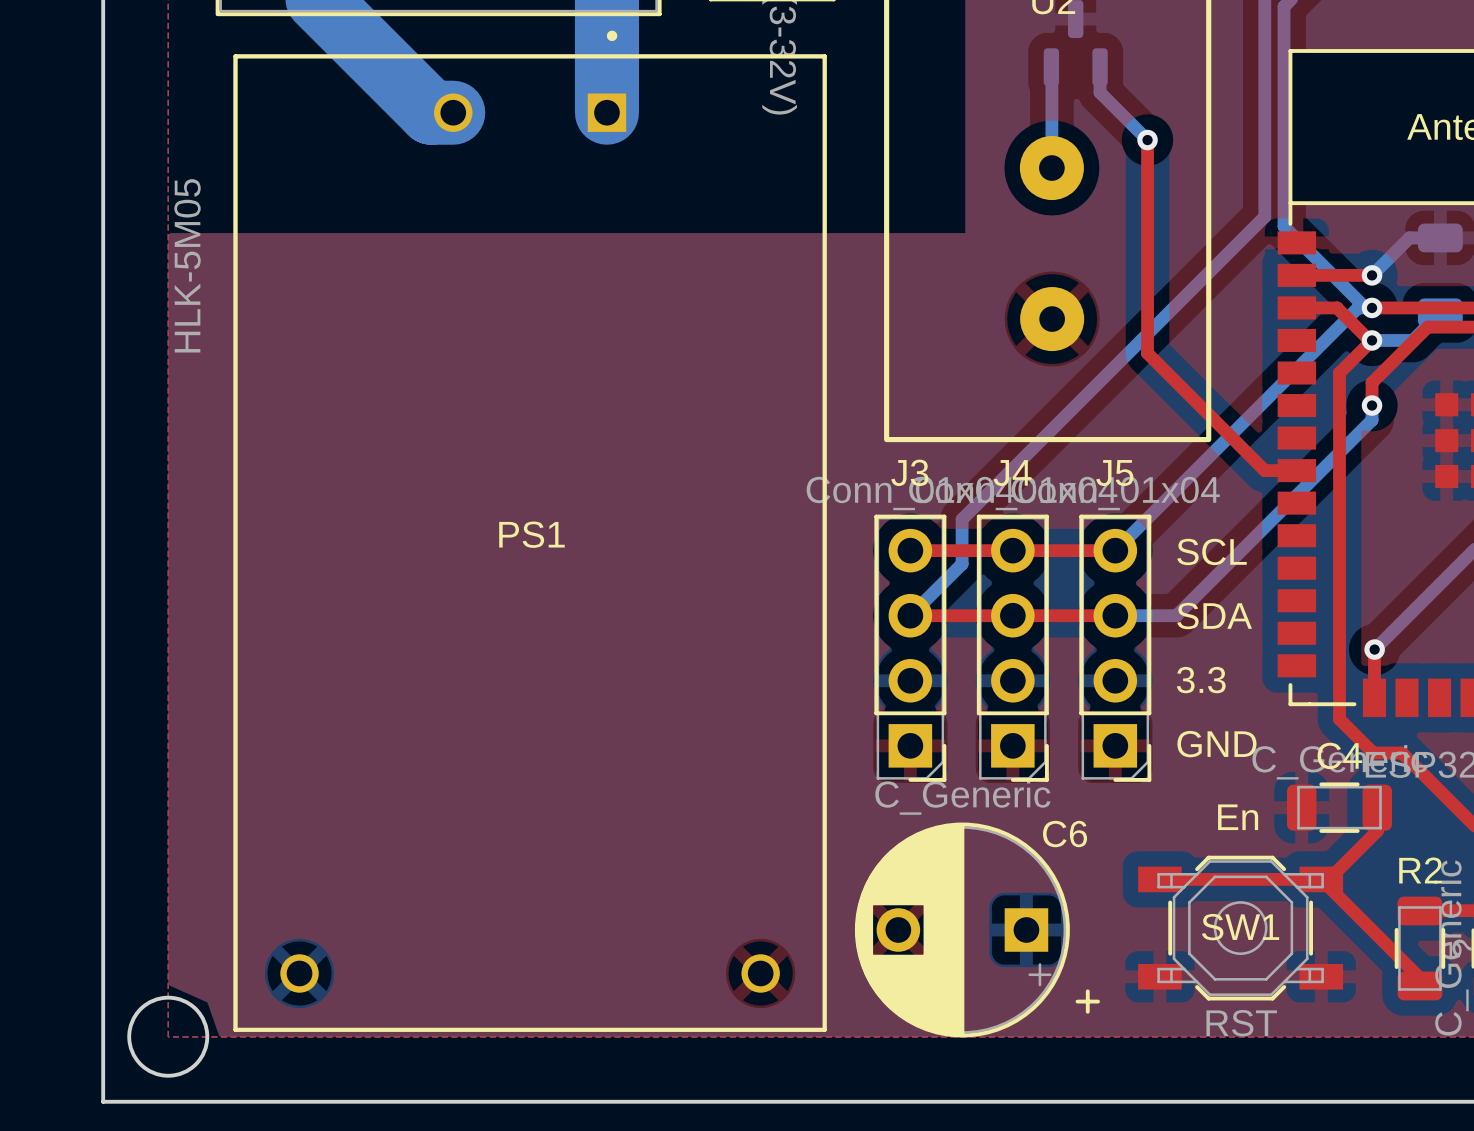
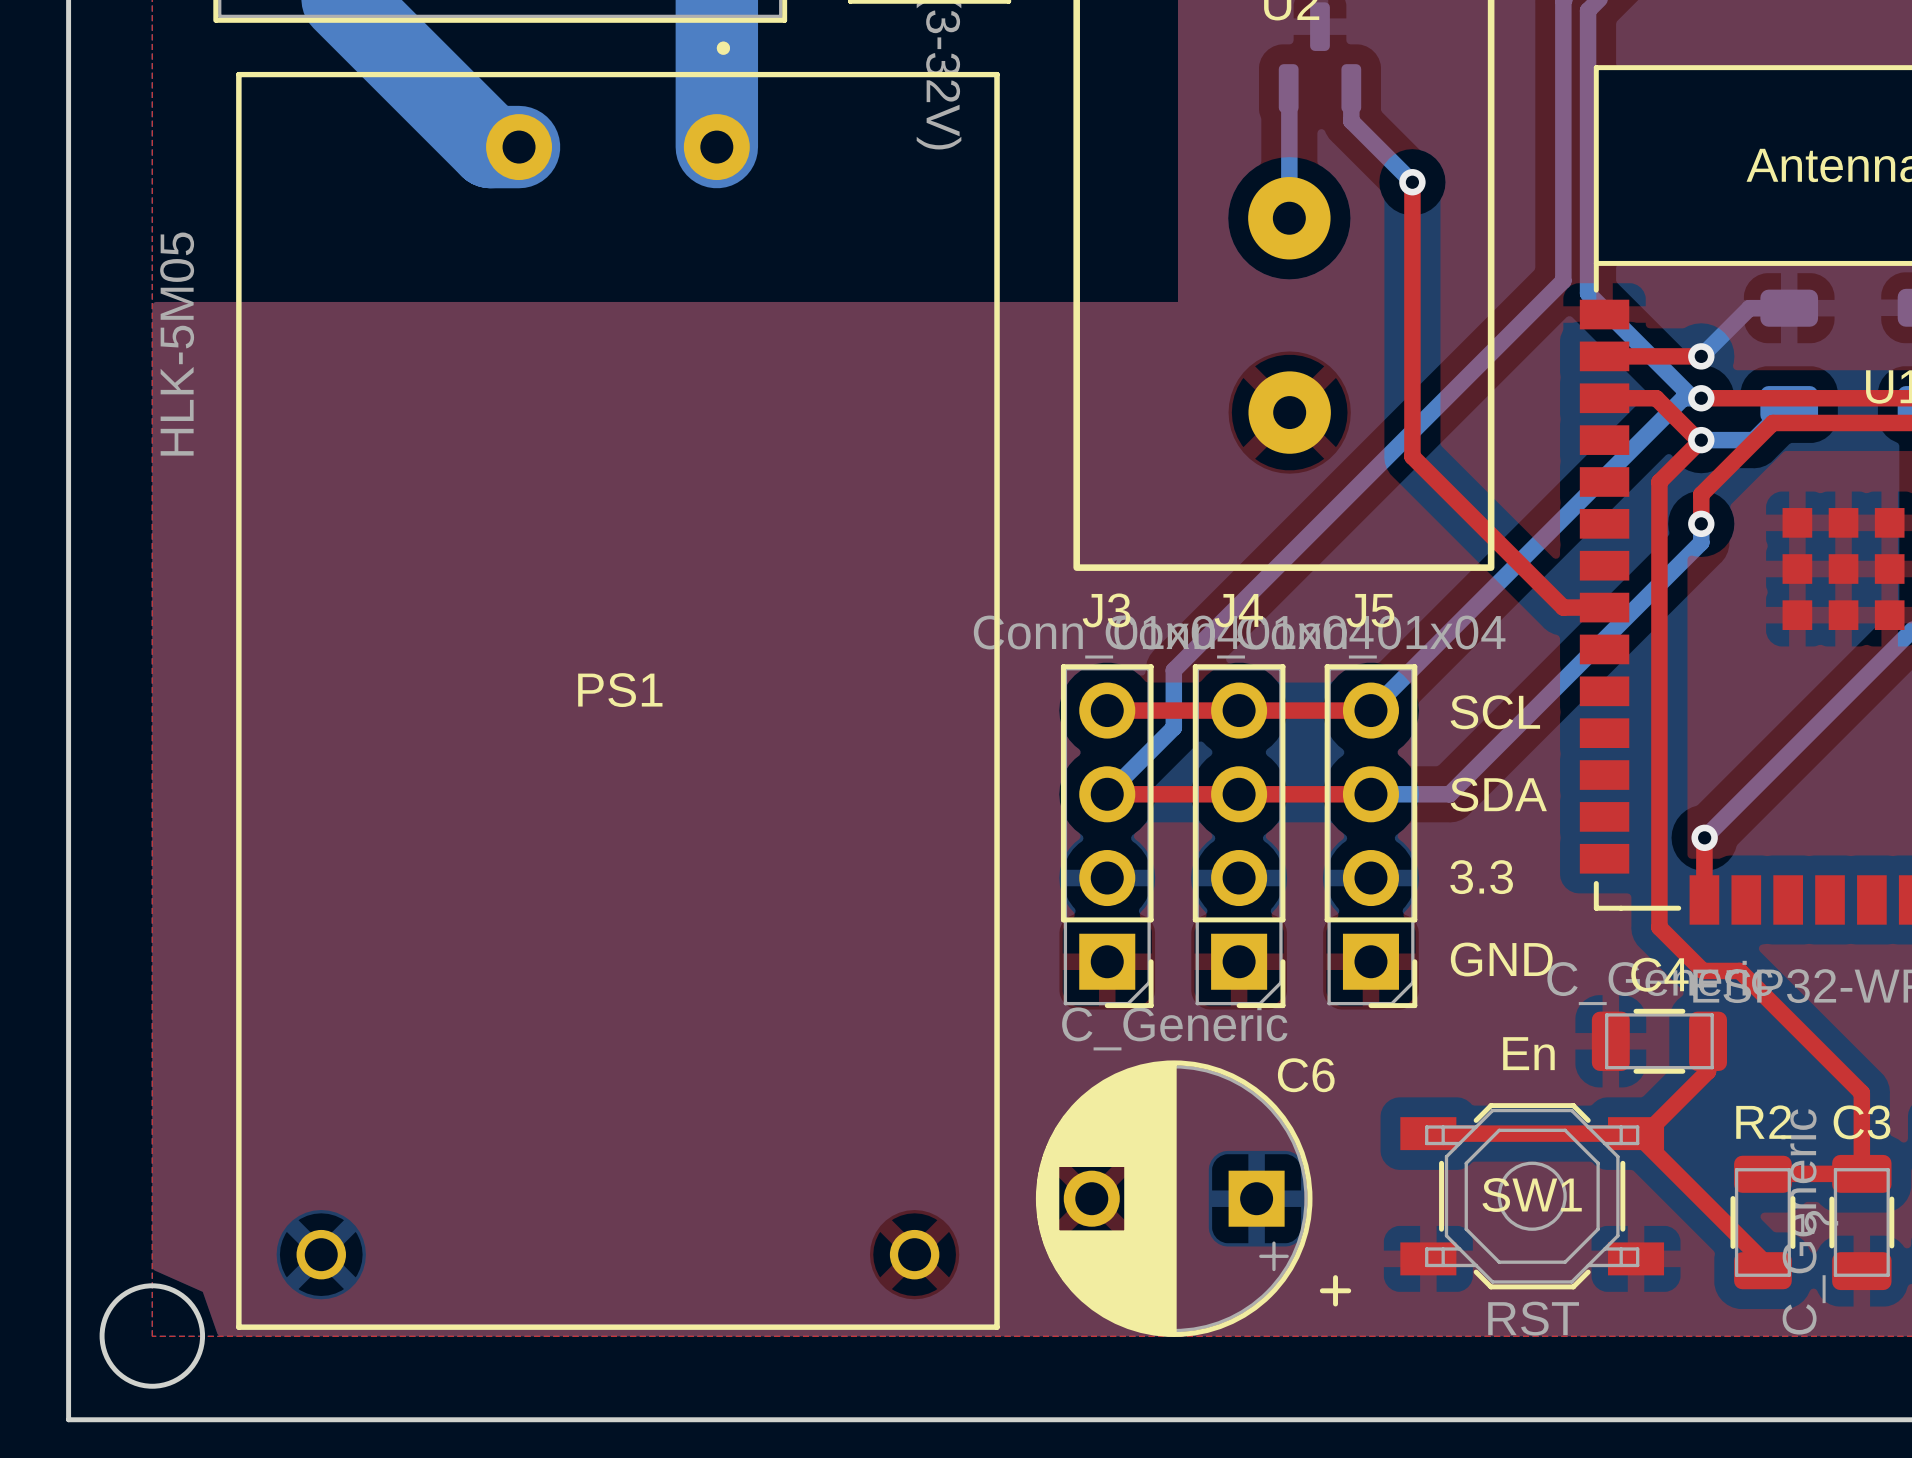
PS1 footprint: [233, 30, 827, 1032] -> [236, 41, 1000, 1330]

